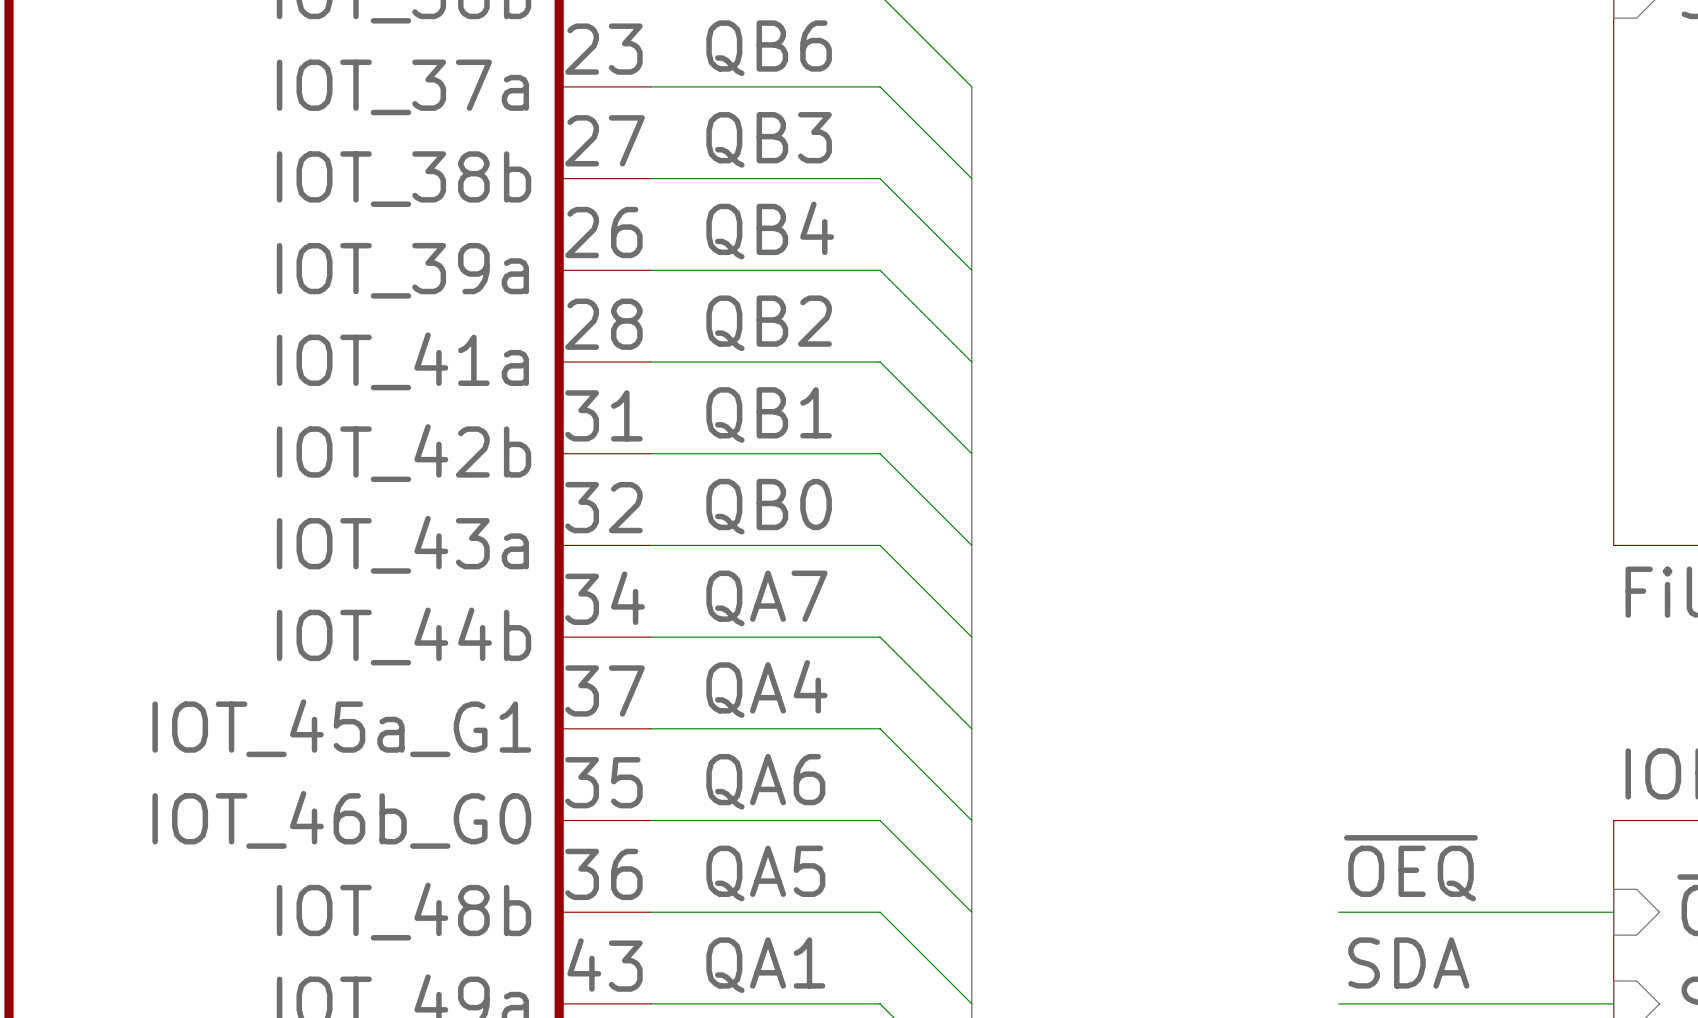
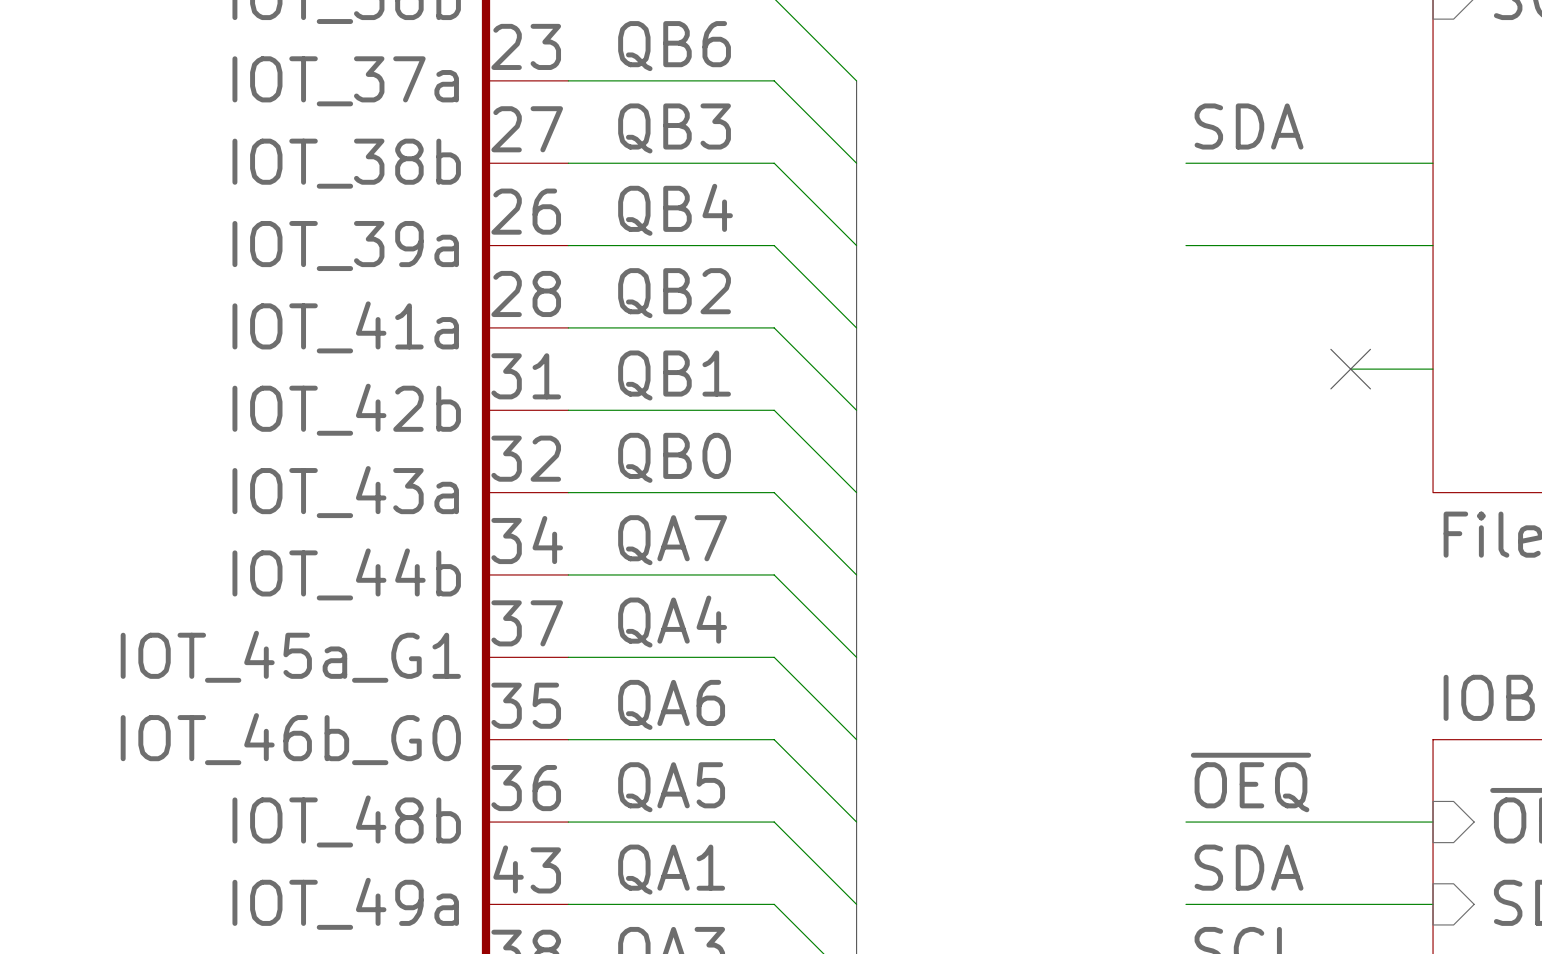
label: none -> SDA (1249, 126)
wire: none -> (1185, 163) (1433, 163)
wire: none -> (1185, 245) (1433, 245)
wire: none -> (1350, 369) (1433, 369)
no-connect mark: none -> (1350, 369)

